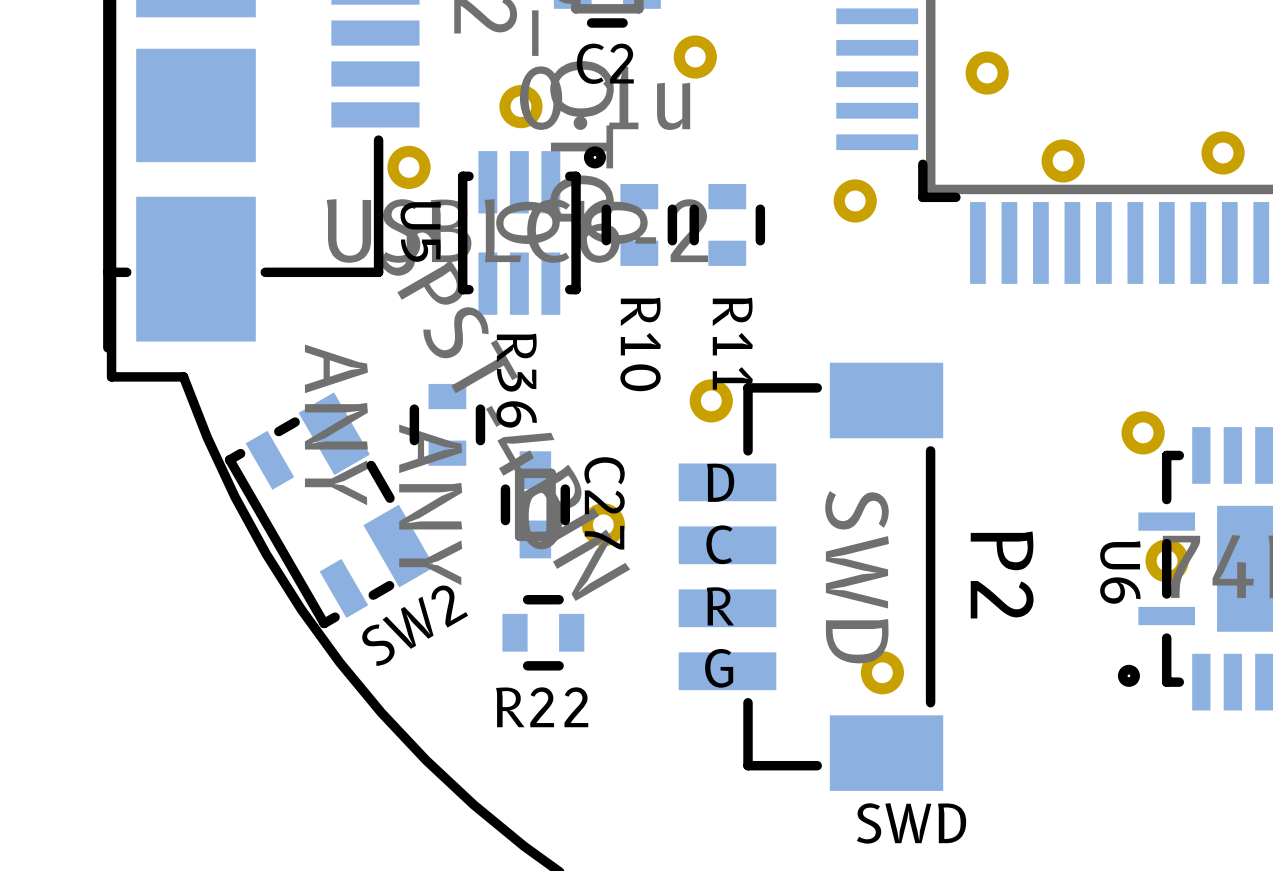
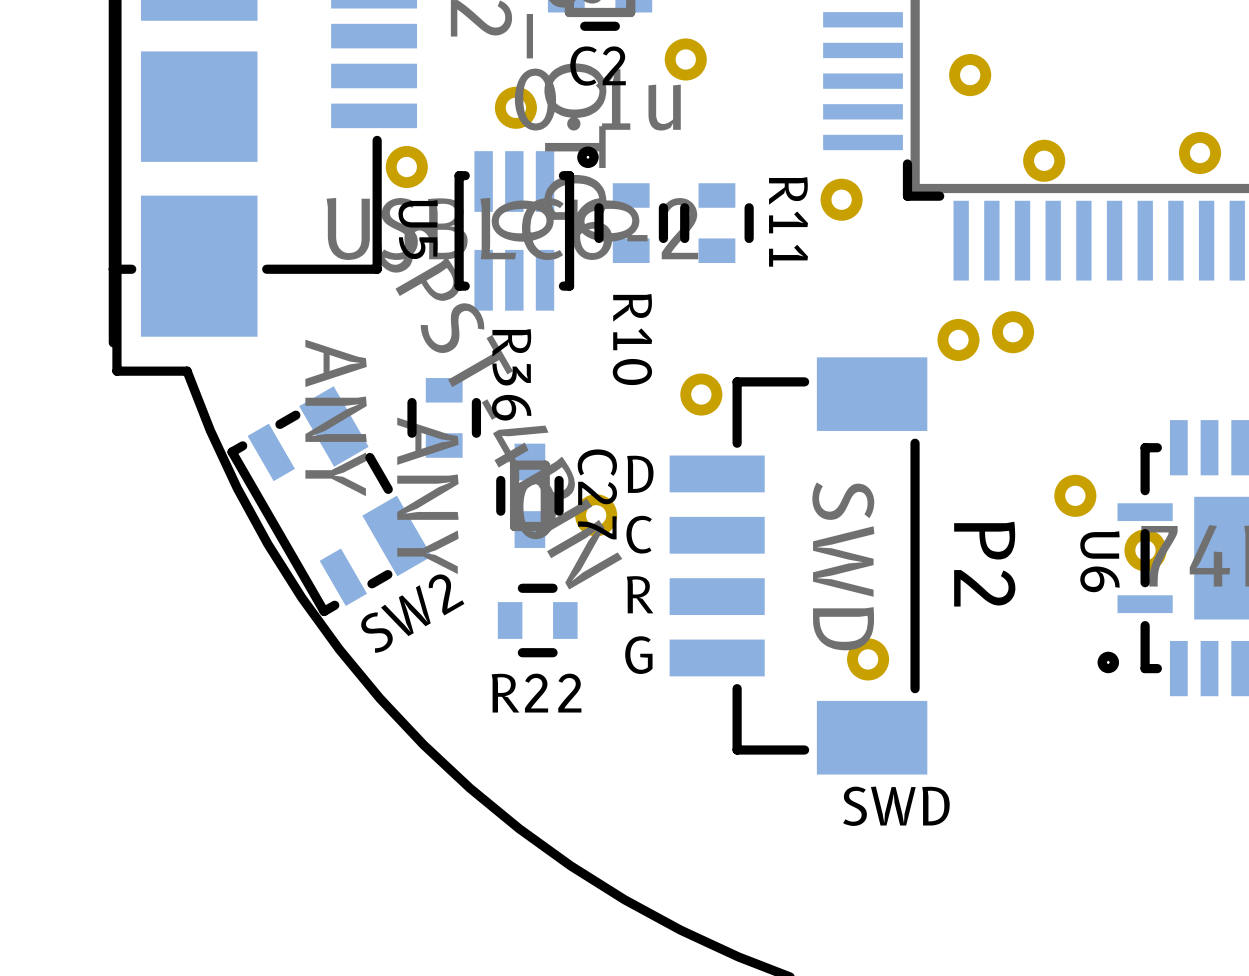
part: none -> (1013, 332)
R11 name position: R11 (732, 343) -> R11 (788, 221)
part: none -> (958, 339)
part: (1143, 432) -> none
text position: D (720, 482) -> D (640, 474)
part: none -> (1075, 495)
text position: C (719, 544) -> C (639, 534)
text position: R (720, 606) -> R (640, 594)
text position: G (719, 668) -> G (638, 655)

